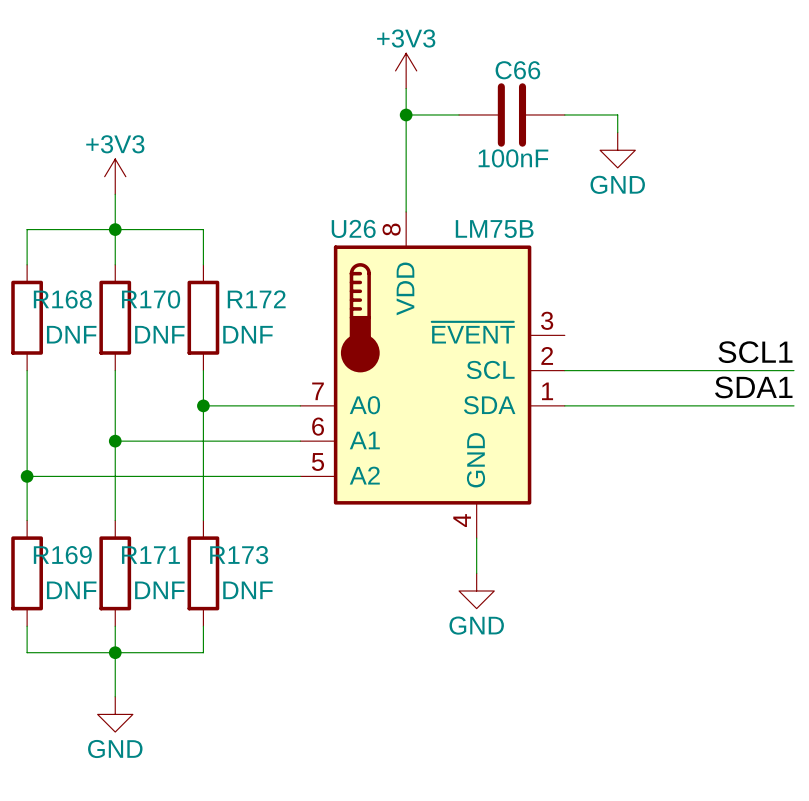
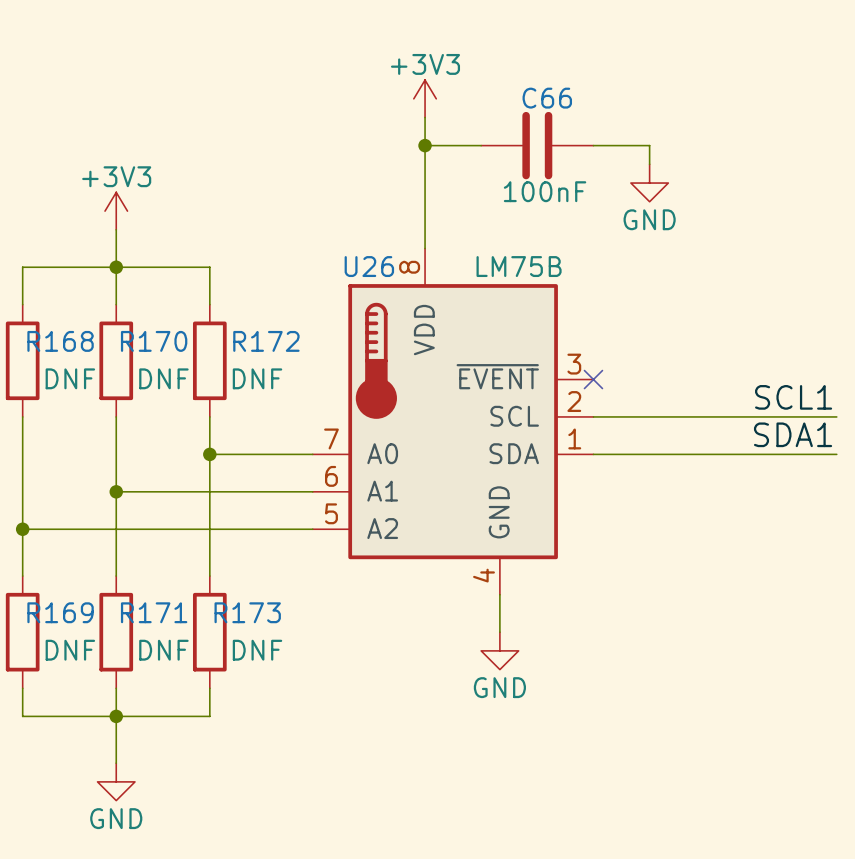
no-connect mark: none -> (593, 379)

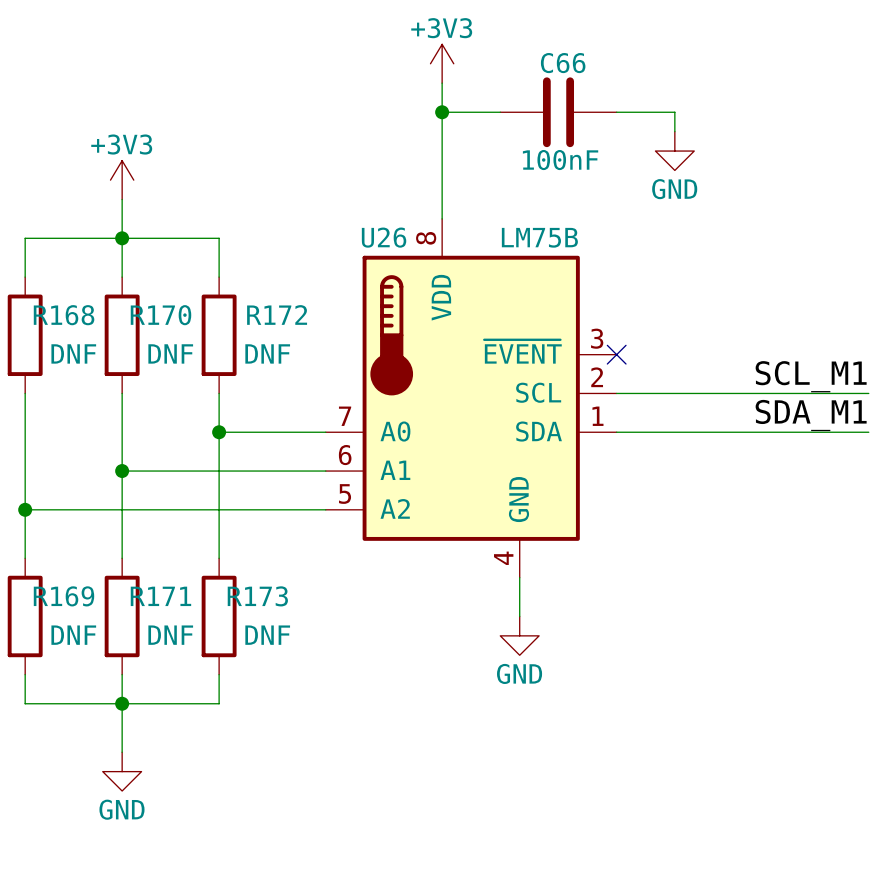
label: SCL1 (793, 397) -> SCL_M1 (811, 376)
label: SDA1 (793, 434) -> SDA_M1 (811, 415)

